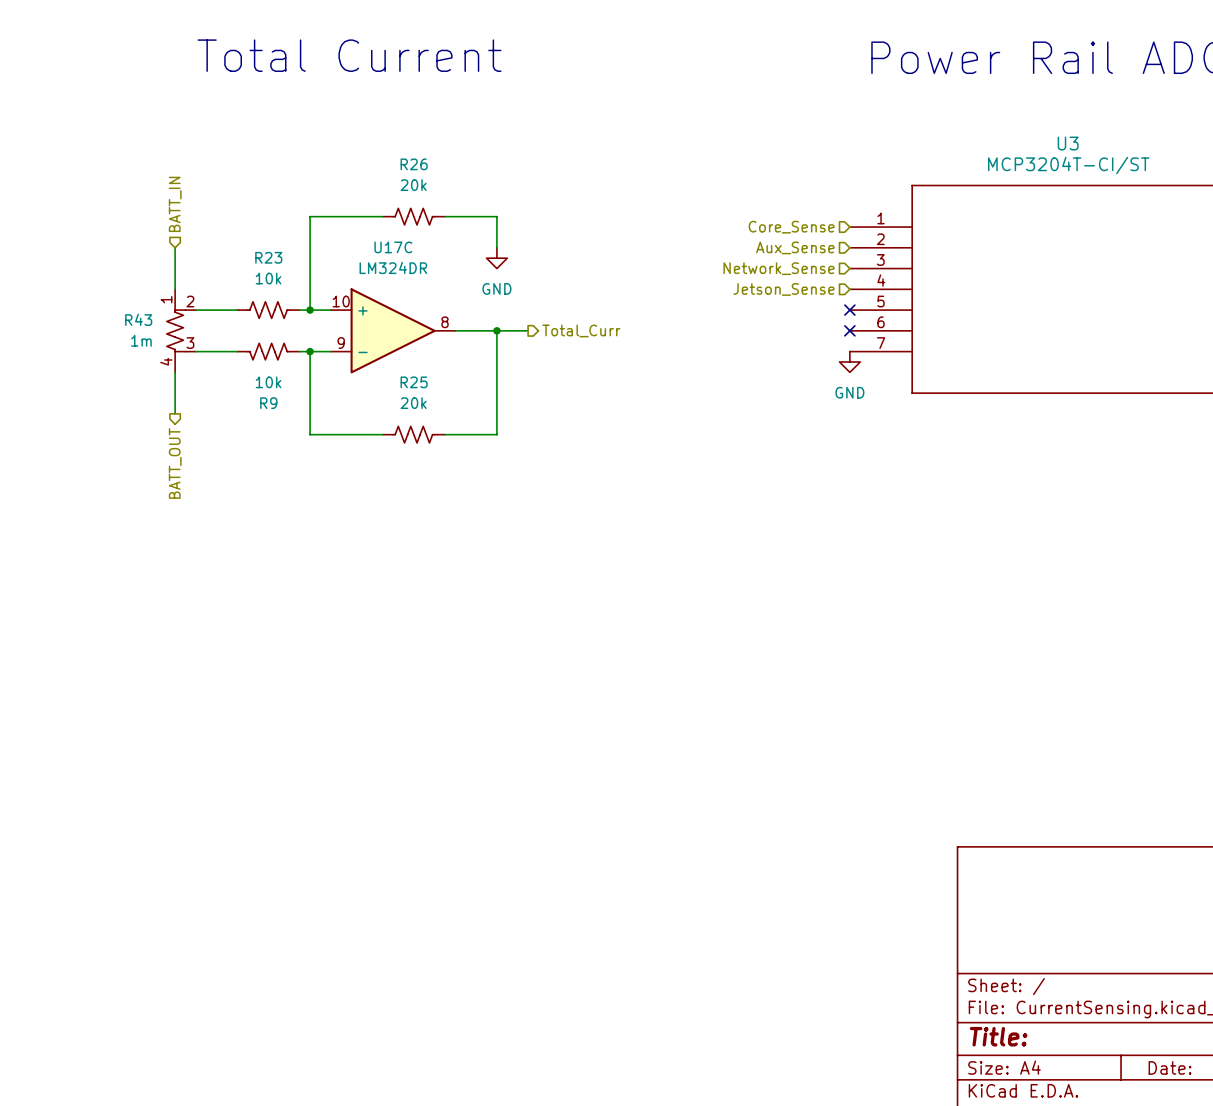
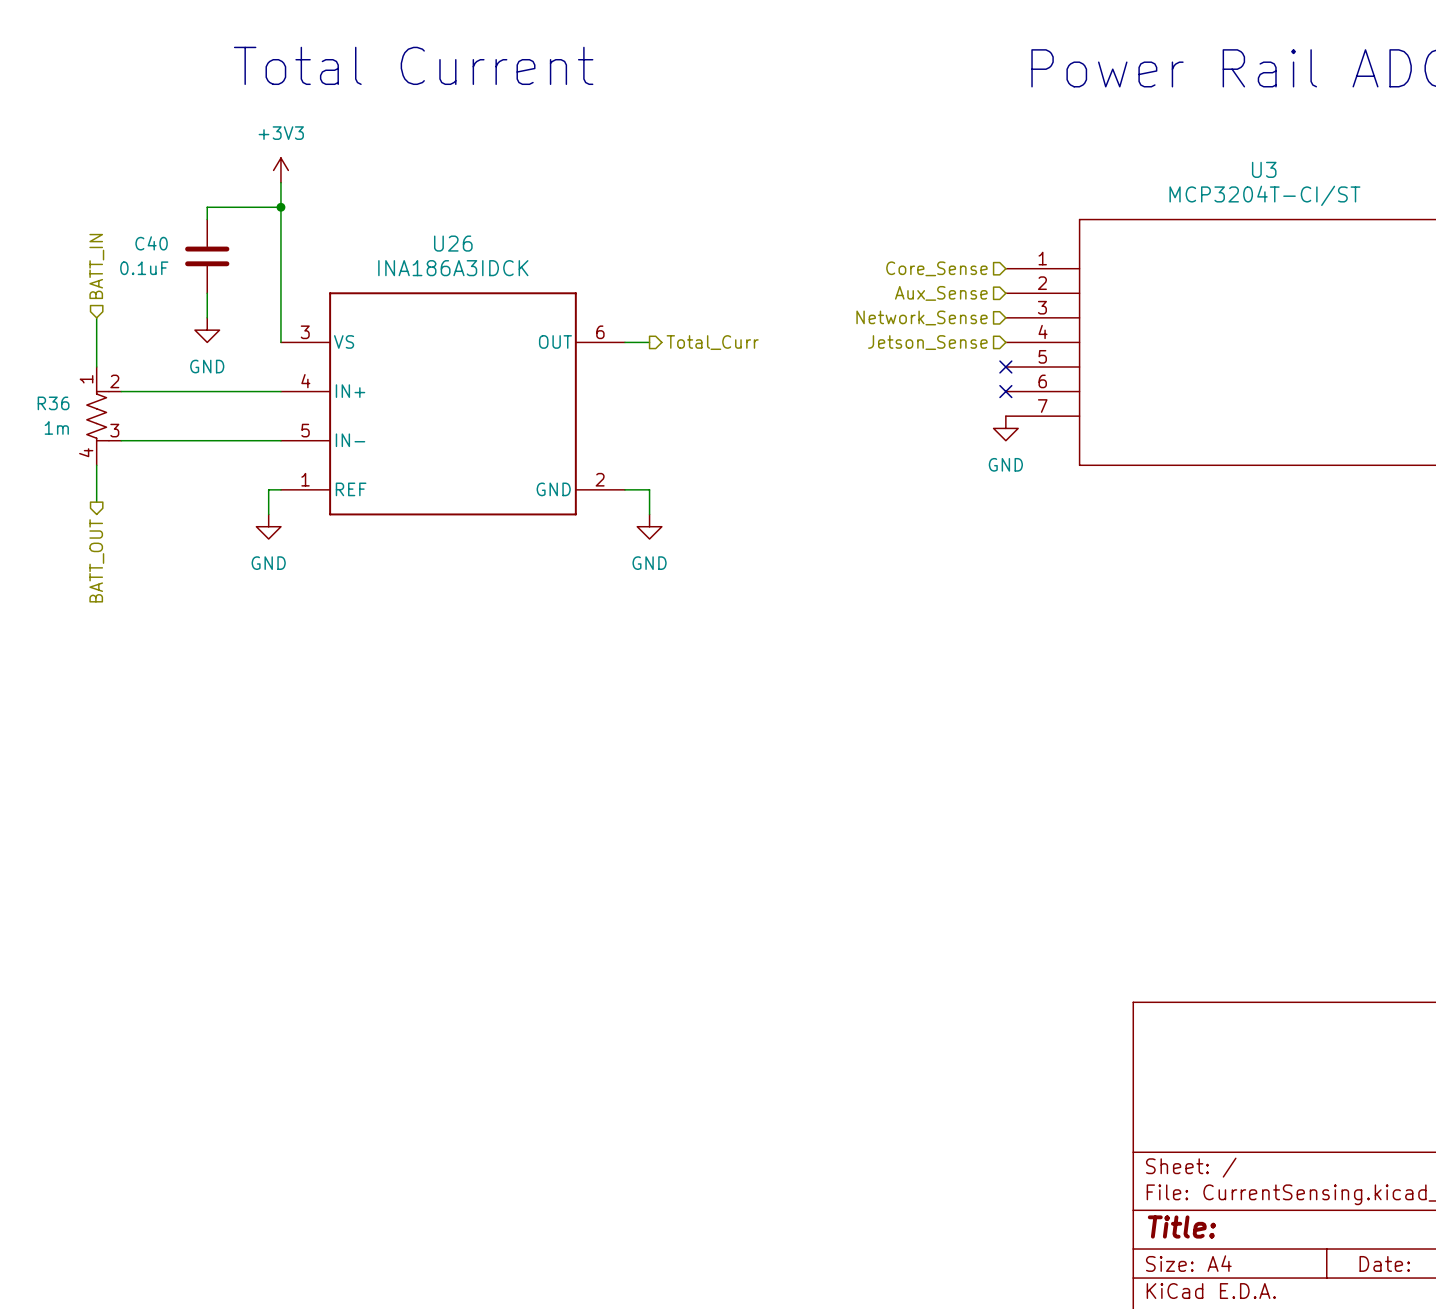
power symbol: none -> +3V3 (280, 170)
wire: none -> (280, 182) (280, 342)
wire: none -> (280, 207) (207, 207) (207, 219)
junction: none -> (280, 207)
hierarchical label position: BATT_IN (175, 204) -> BATT_IN (96, 266)
C40: none -> 0.1uF (207, 256)
wire: (382, 216) (310, 216) (310, 310) -> none
R26: 20k (413, 216) -> none
wire: (445, 216) (496, 216) (496, 247) -> none
power symbol: GND (496, 258) -> none
power symbol: none -> GND (207, 330)
wire: none -> (624, 342) (649, 342)
wire: (195, 310) (237, 310) -> none
R23: 10k (268, 310) -> none
wire: (299, 310) (330, 310) -> none
junction: (310, 310) -> none
wire: none -> (121, 391) (280, 391)
R43: 1m (181, 330) -> none
U17C: LM324DR (393, 330) -> none
wire: (455, 330) (528, 330) -> none
wire: (496, 330) (496, 434) (445, 434) -> none
junction: (496, 330) -> none
hierarchical label position: Total_Curr (581, 330) -> Total_Curr (712, 342)
U26: none -> INA186A3IDCK (452, 403)
R36: none -> 1m (104, 416)
wire: (195, 351) (237, 351) -> none
R9: 10k (268, 351) -> none
wire: (299, 351) (330, 351) -> none
wire: (310, 351) (310, 434) (382, 434) -> none
junction: (310, 351) -> none
wire: none -> (121, 440) (280, 440)
wire: (175, 372) (175, 413) -> (96, 317) (96, 366)
wire: none -> (96, 465) (96, 502)
wire: none -> (280, 489) (268, 489) (268, 514)
wire: none -> (624, 489) (649, 489) (649, 514)
R25: 20k (413, 434) -> none
power symbol: none -> GND (268, 526)
power symbol: none -> GND (649, 526)
hierarchical label position: BATT_OUT (175, 463) -> BATT_OUT (96, 560)

